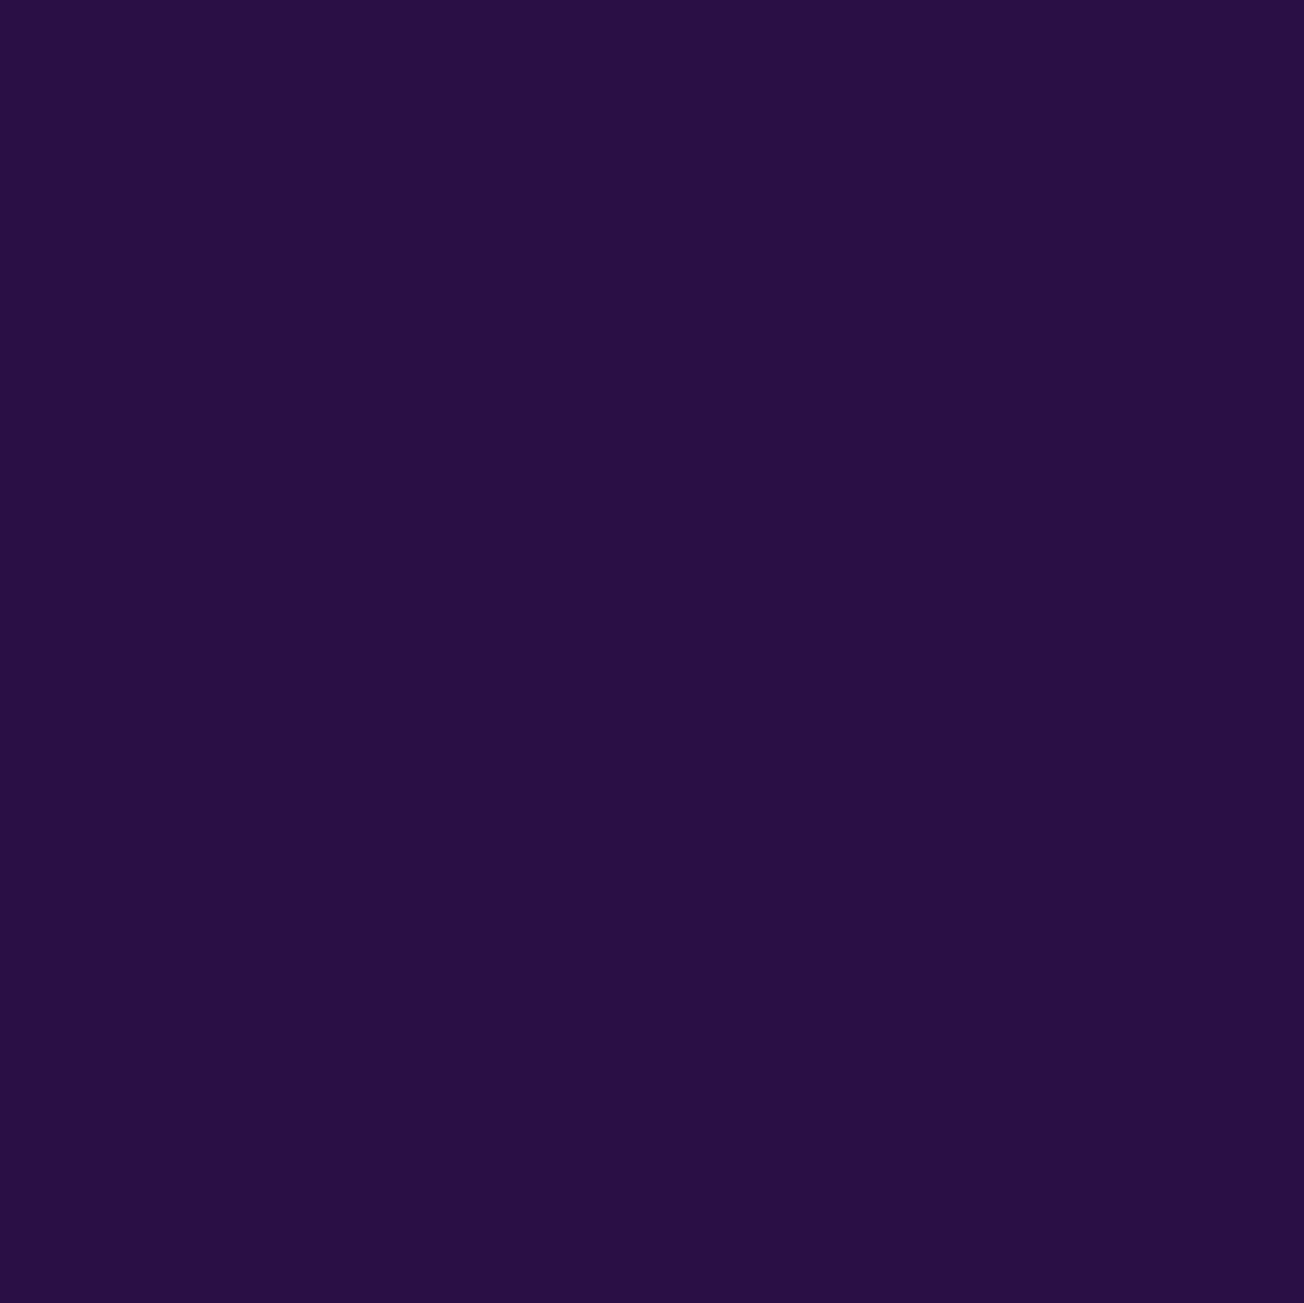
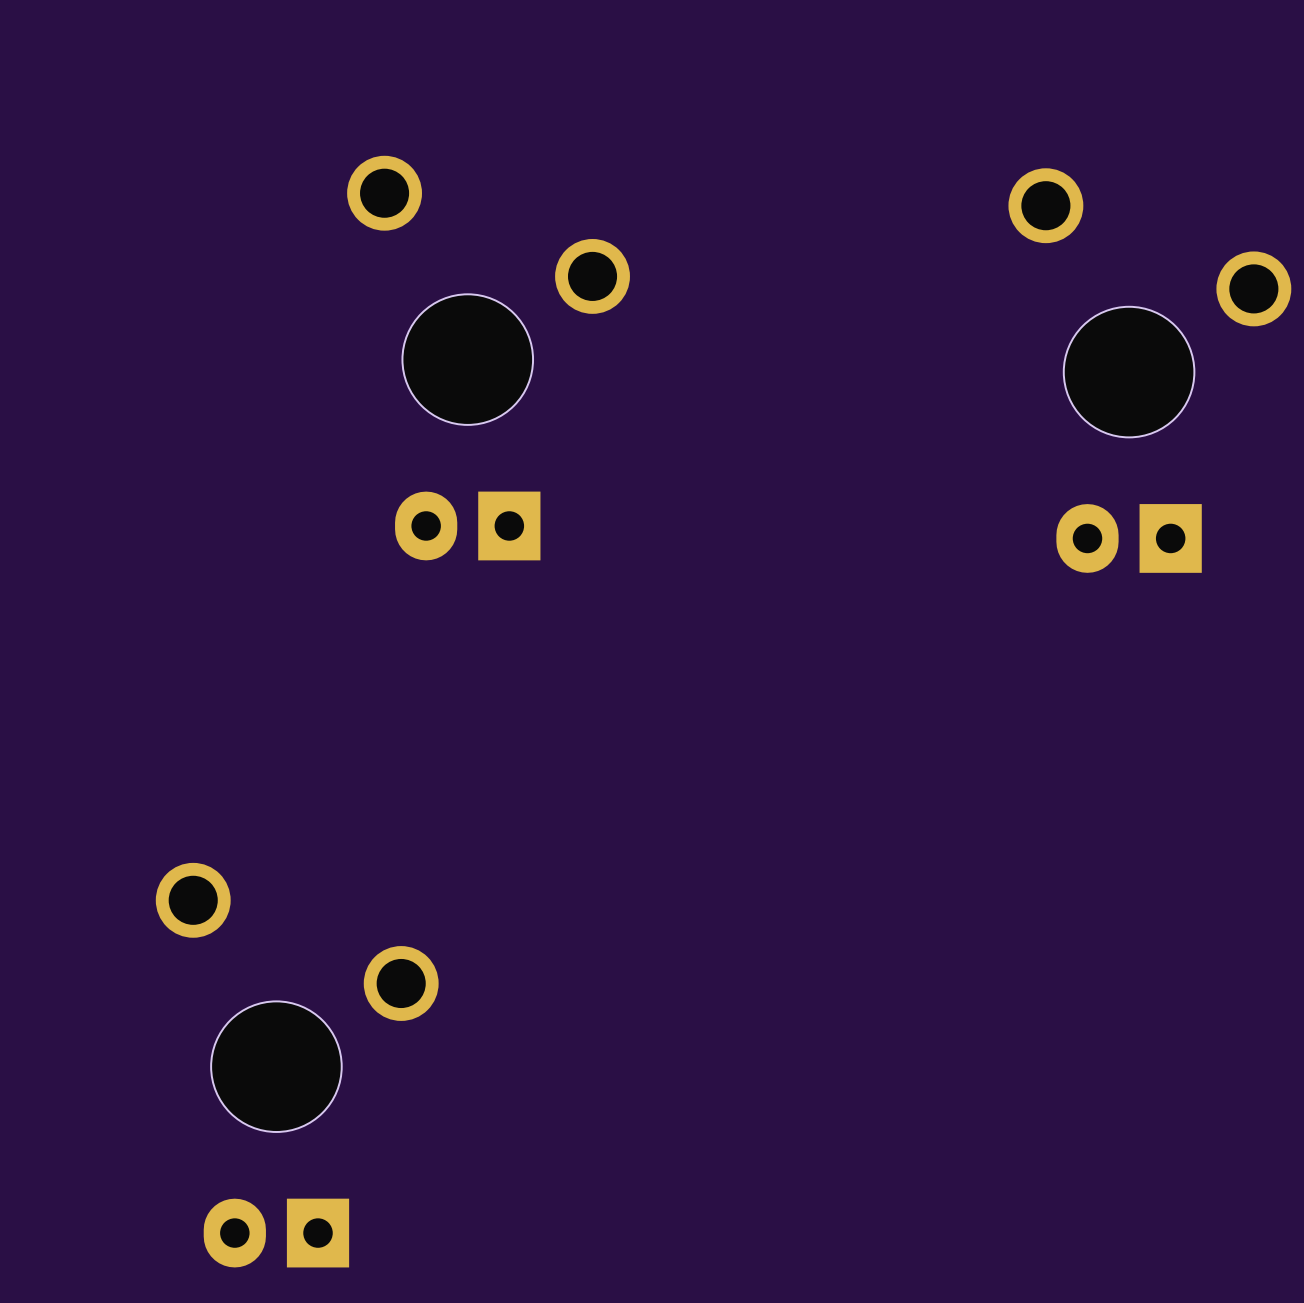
part: none -> (488, 358)
part: none -> (1149, 370)
part: none -> (297, 1065)

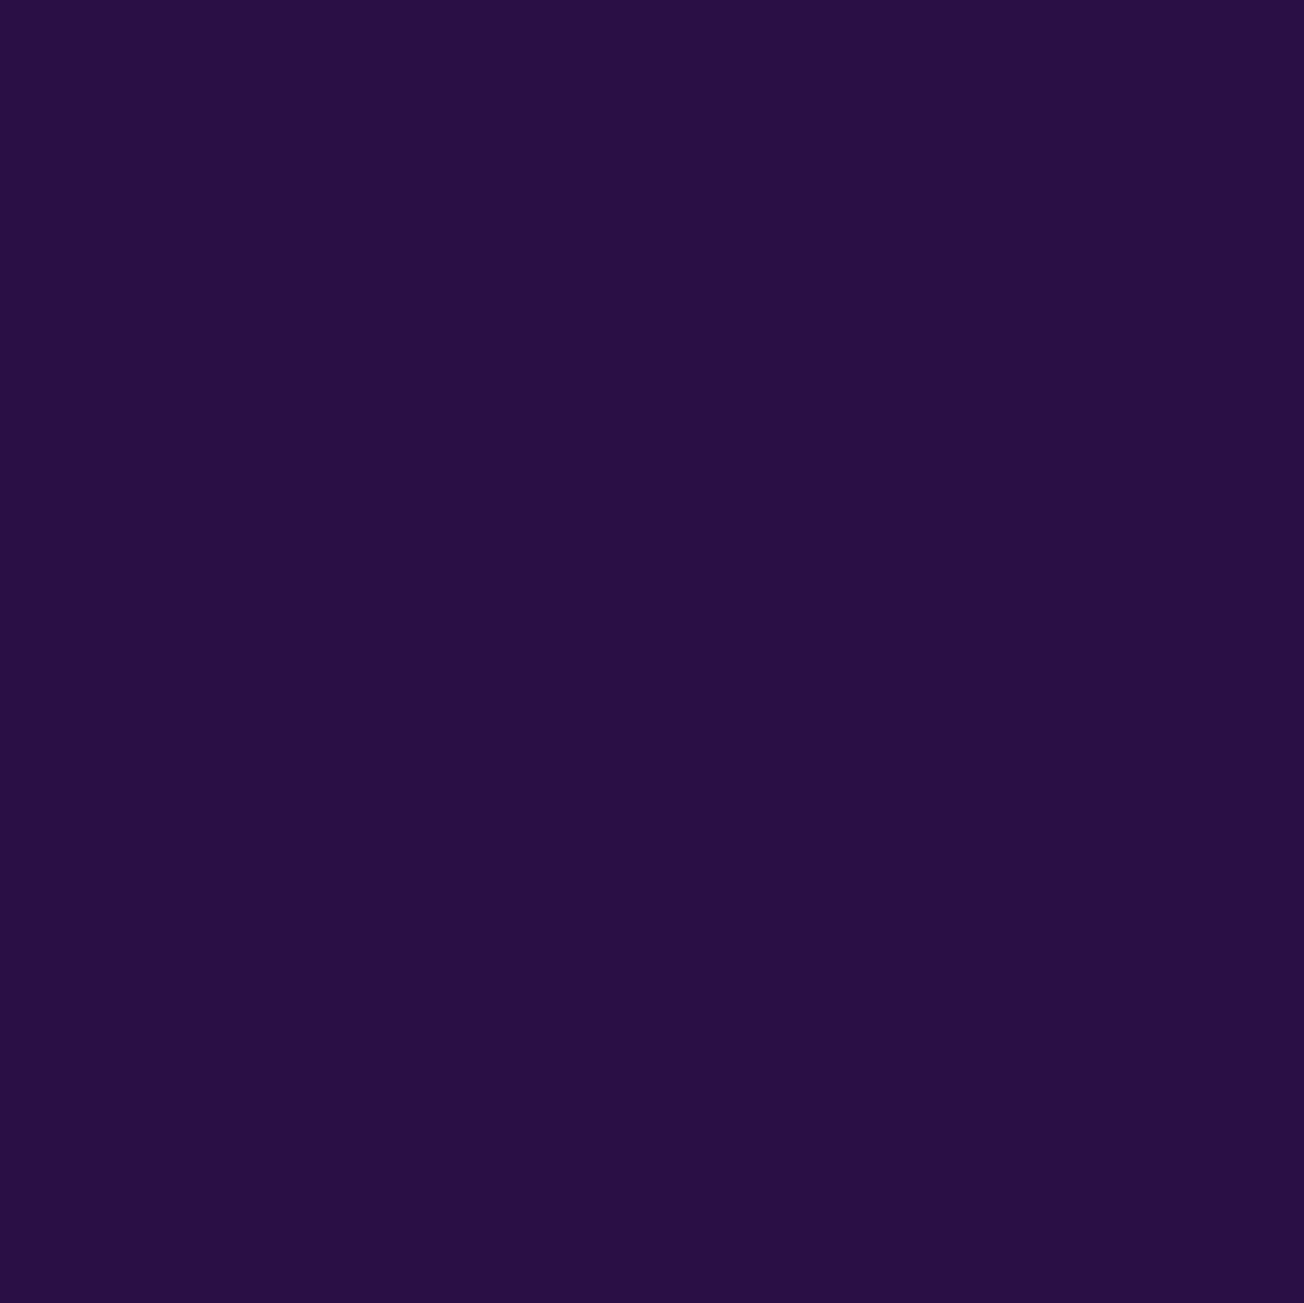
part: (488, 358) -> none
part: (1149, 370) -> none
part: (297, 1065) -> none

